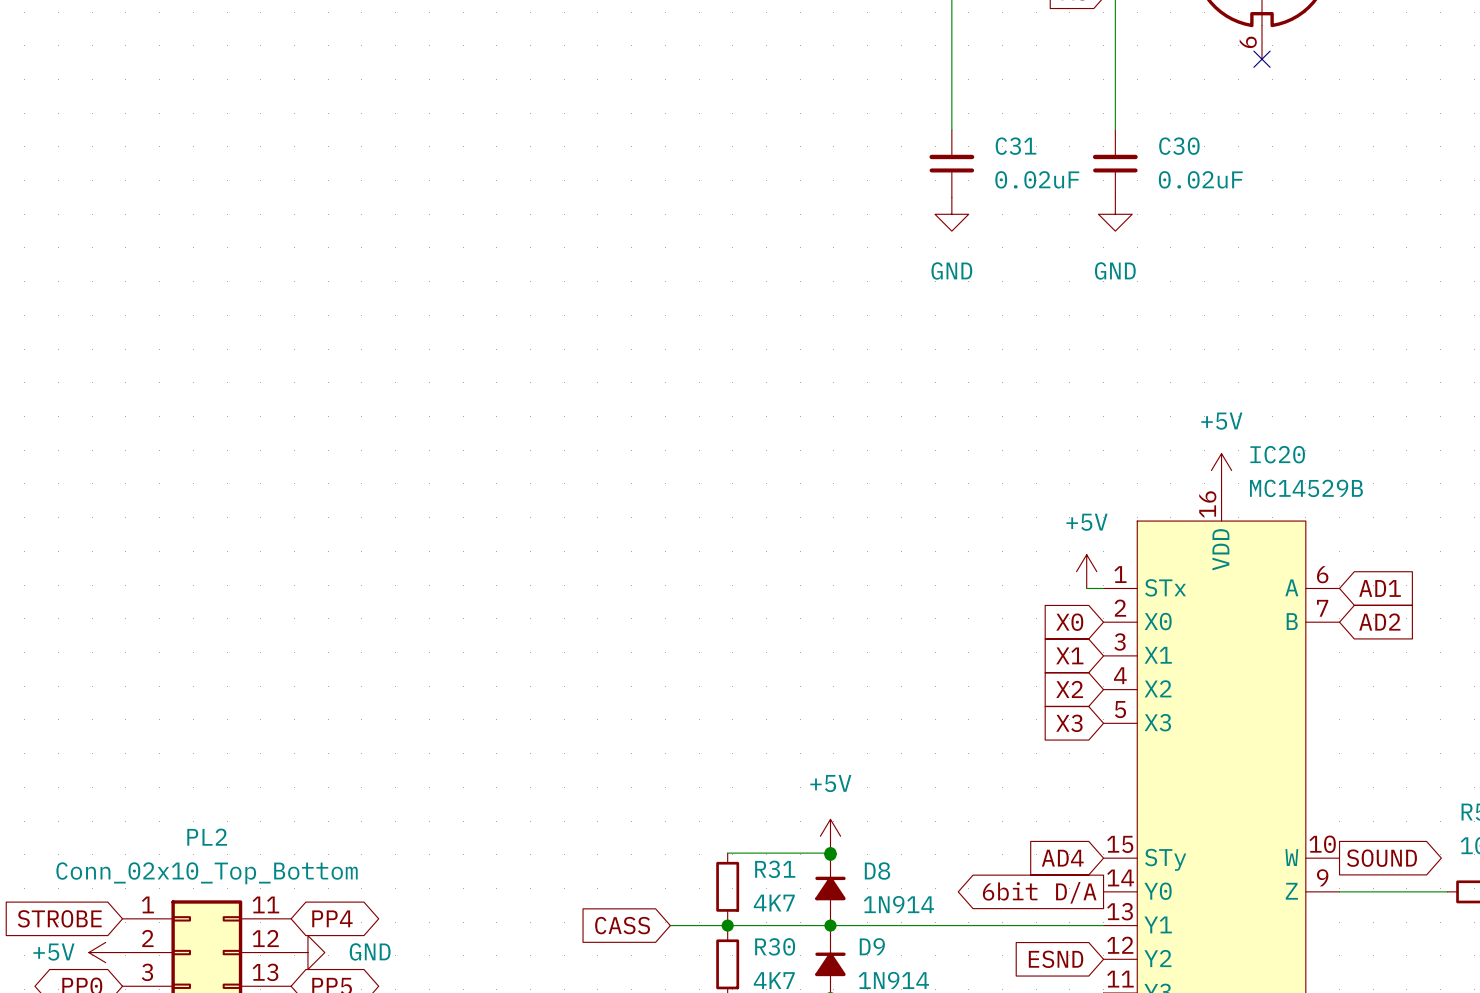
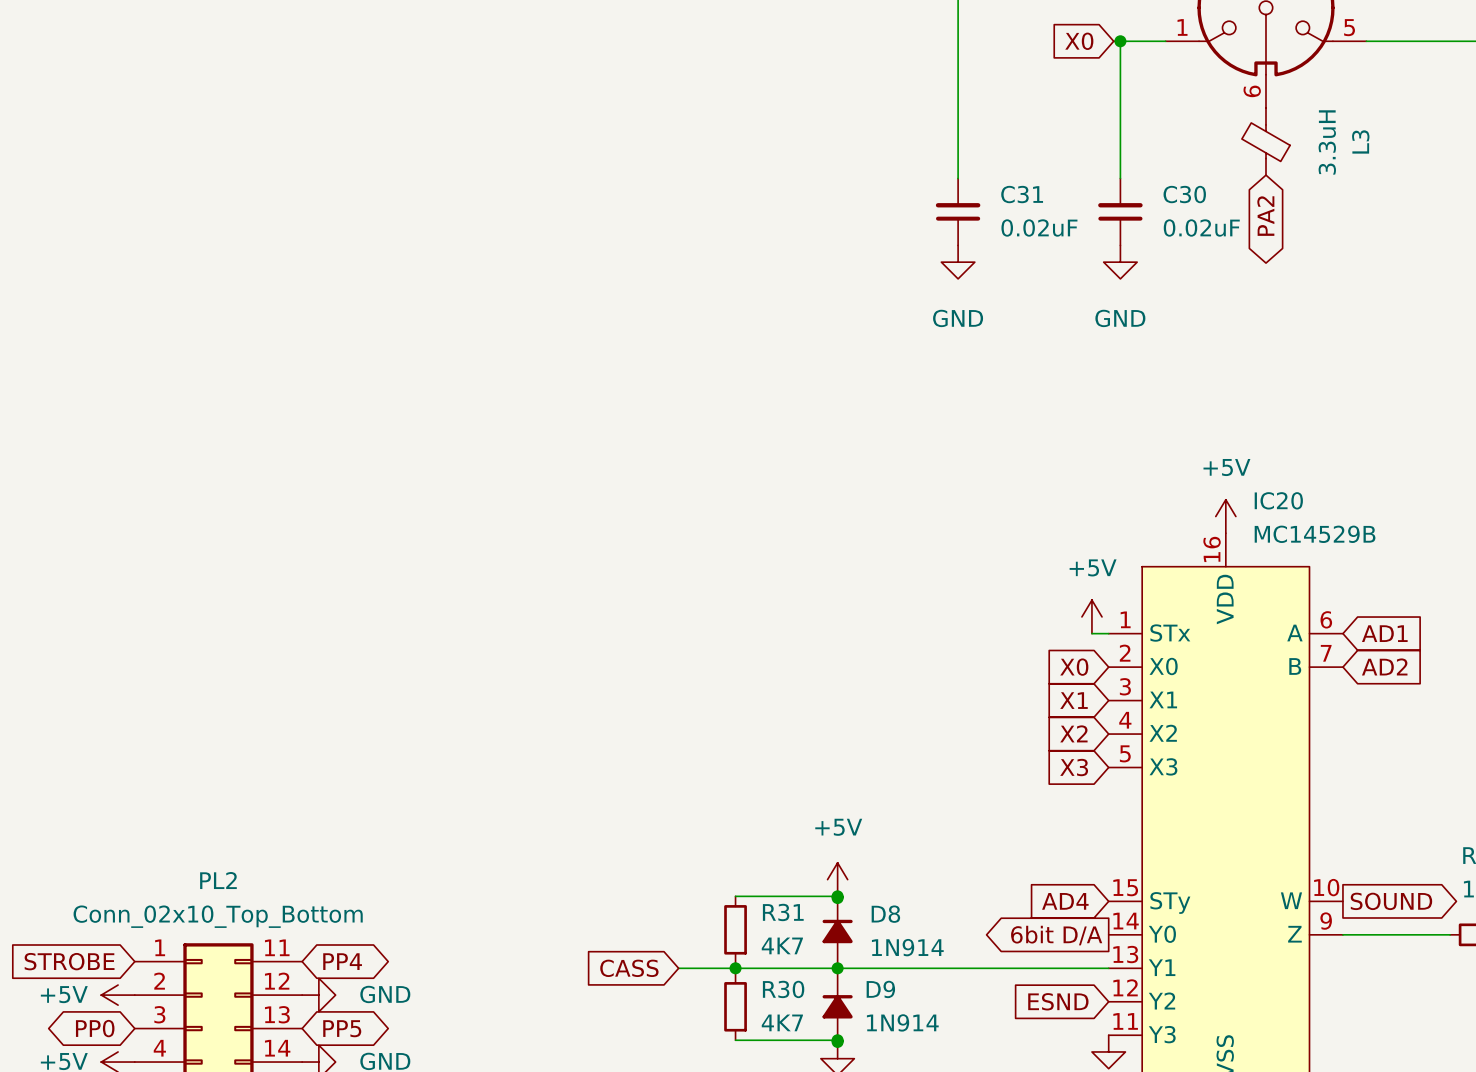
no-connect mark: (1261, 59) -> none
L3: none -> 3.3uH (1265, 141)
global label: none -> PA2 (1265, 216)

